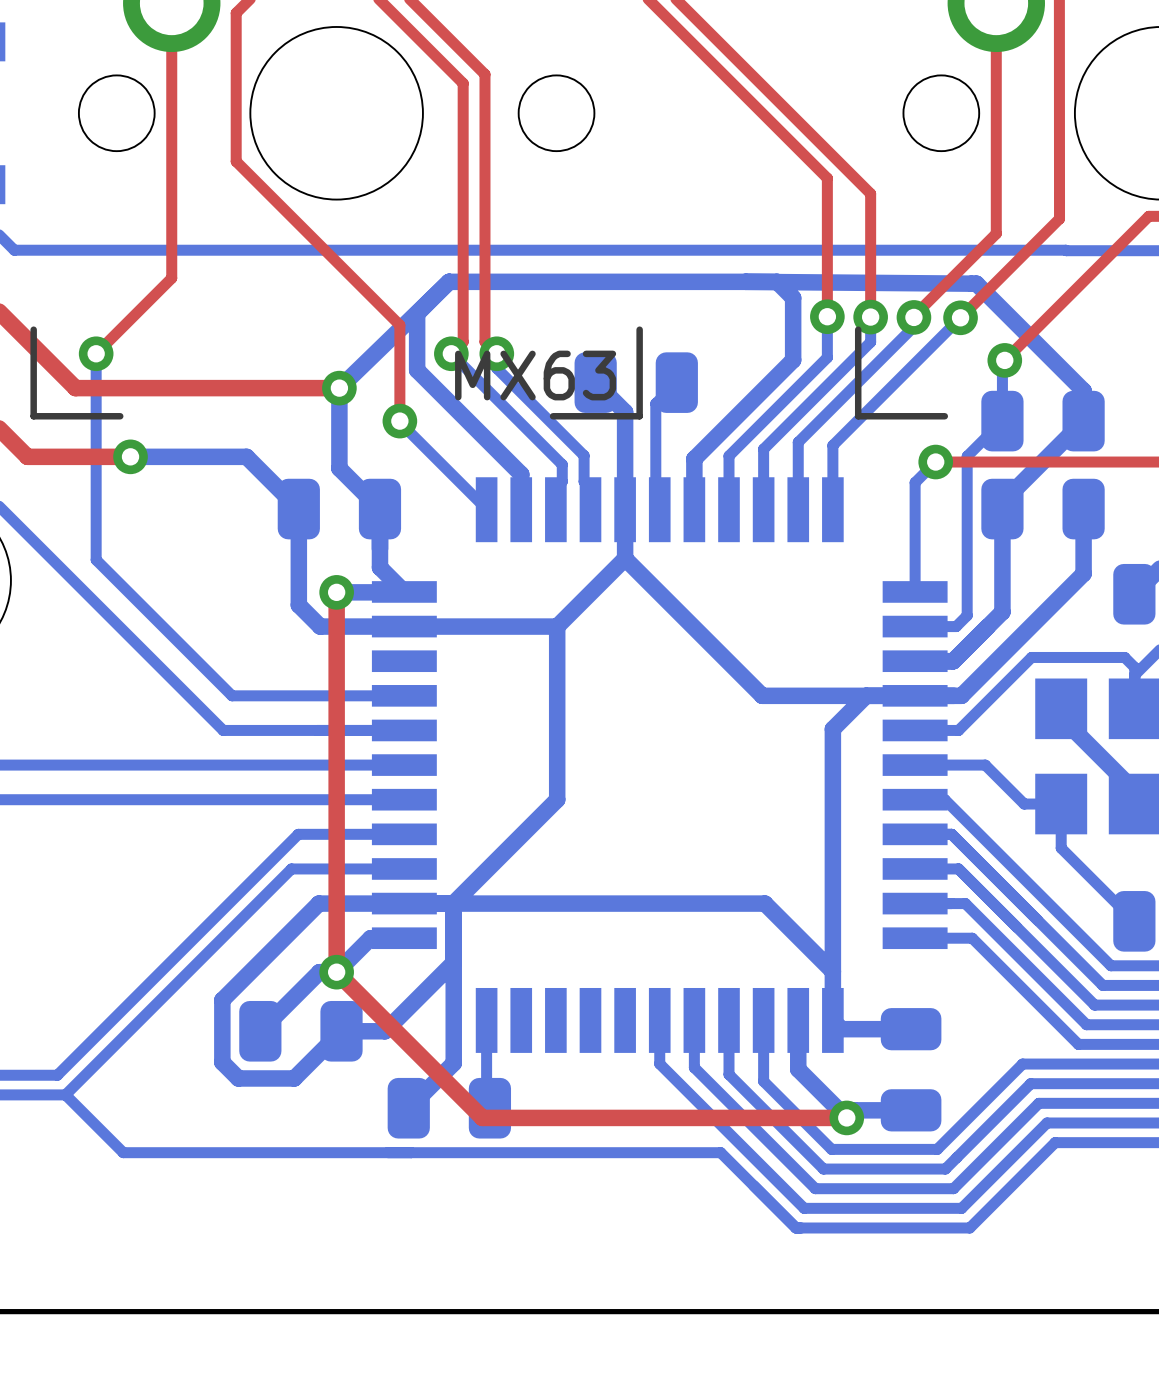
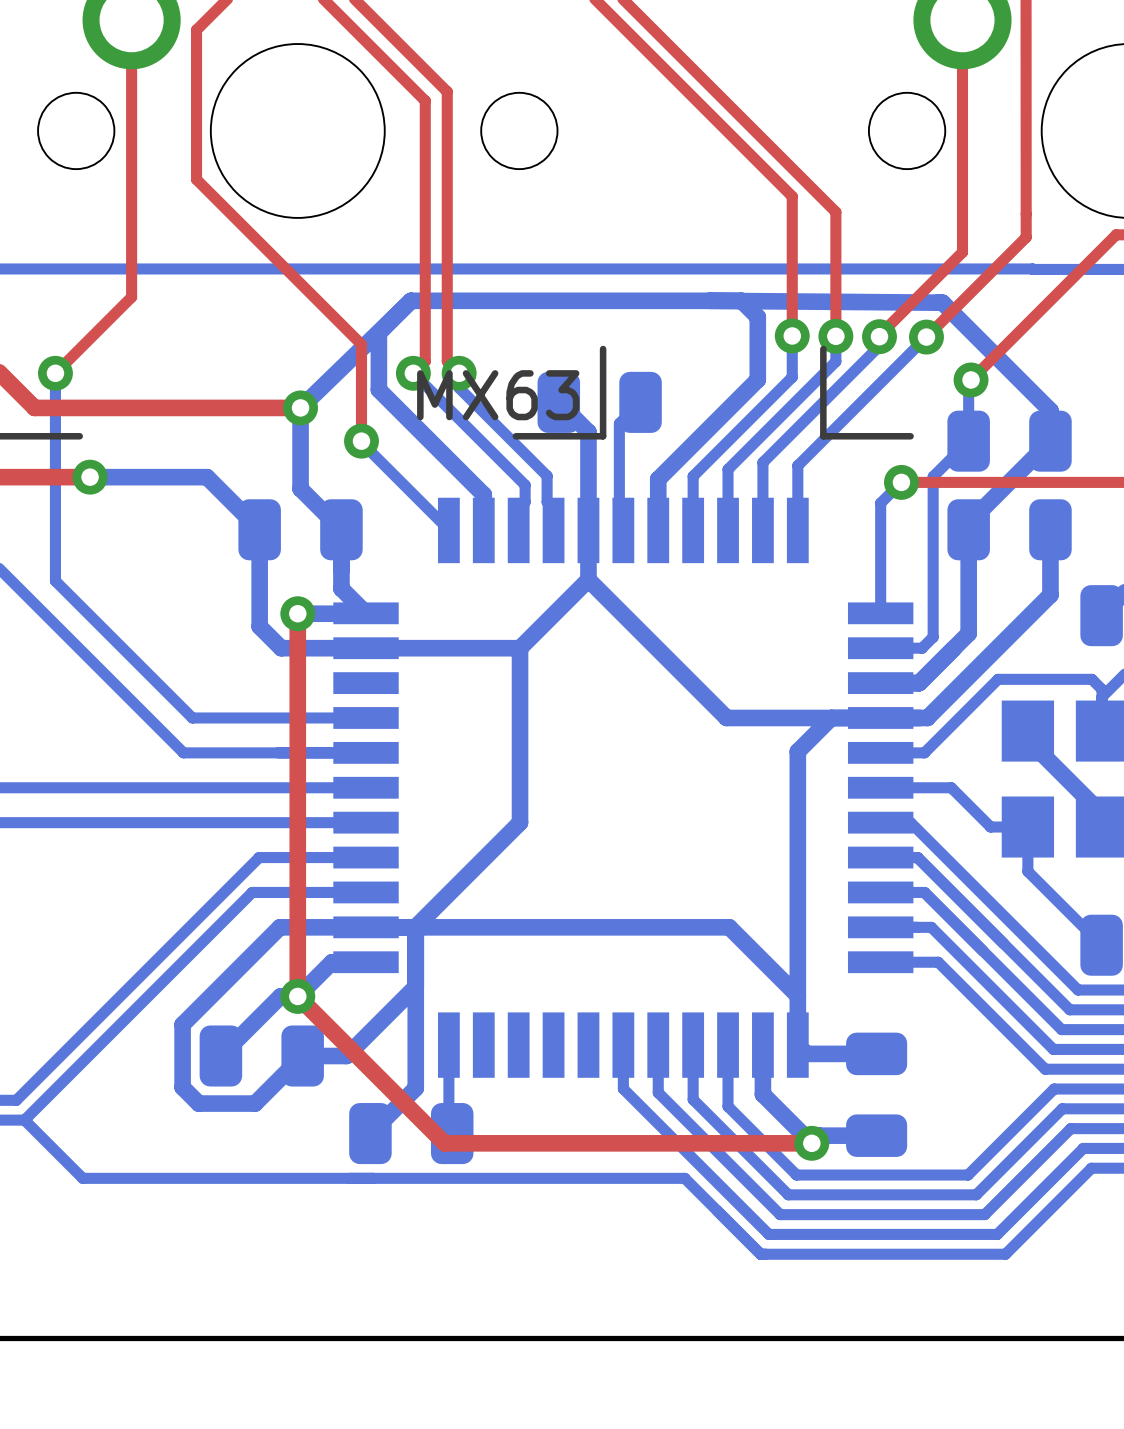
bottom track: (1087, 1064) (1022, 1064) (937, 1149) -> (1054, 1089) (968, 1175) (903, 1175)
bottom track: (1095, 1083) (1030, 1083) (945, 1169) -> (1062, 1108) (976, 1194) (911, 1194)
bottom track: (1103, 1103) (1038, 1103) (953, 1188) -> (1070, 1128) (984, 1214) (919, 1214)
bottom track: (1116, 1122) (1047, 1122) (961, 1208) -> (1083, 1148) (997, 1234) (927, 1234)
bottom track: (1124, 1142) (1055, 1142) (969, 1228) -> (1091, 1168) (1005, 1254) (935, 1254)

